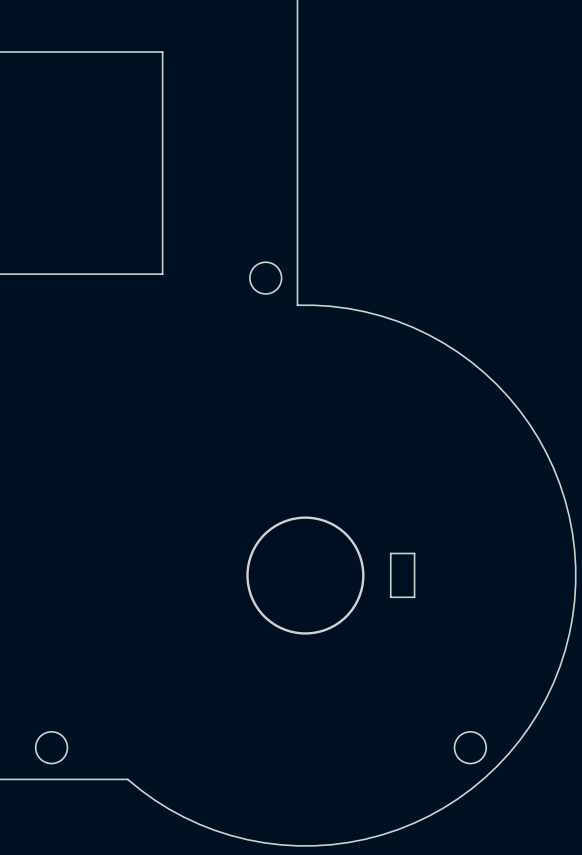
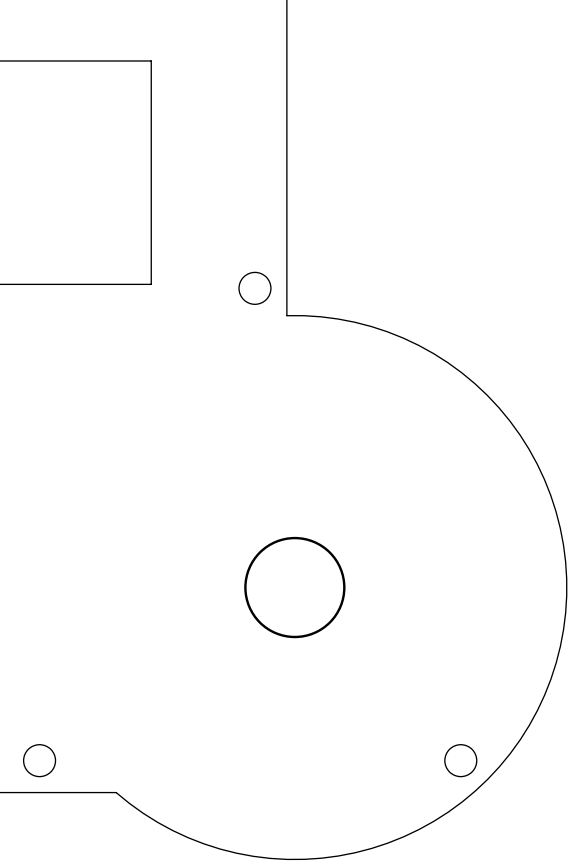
round board edge size: [246, 516, 365, 635] -> [244, 536, 346, 639]
board edge: (390, 553) (414, 553) (414, 597) (390, 597) (390, 553) -> none

